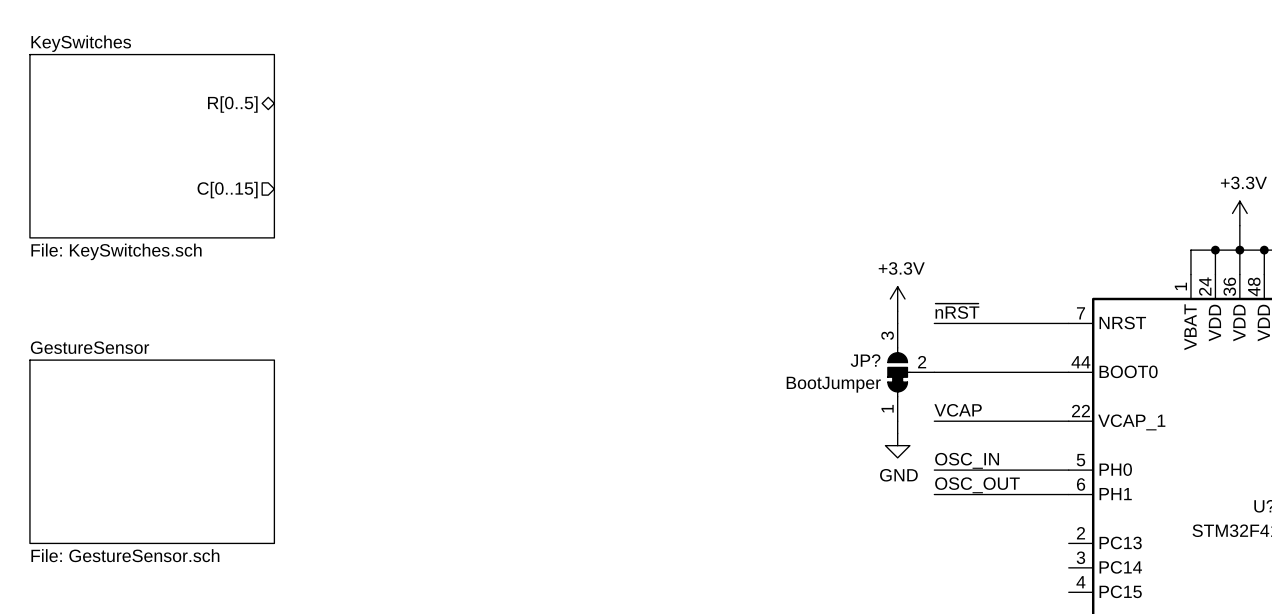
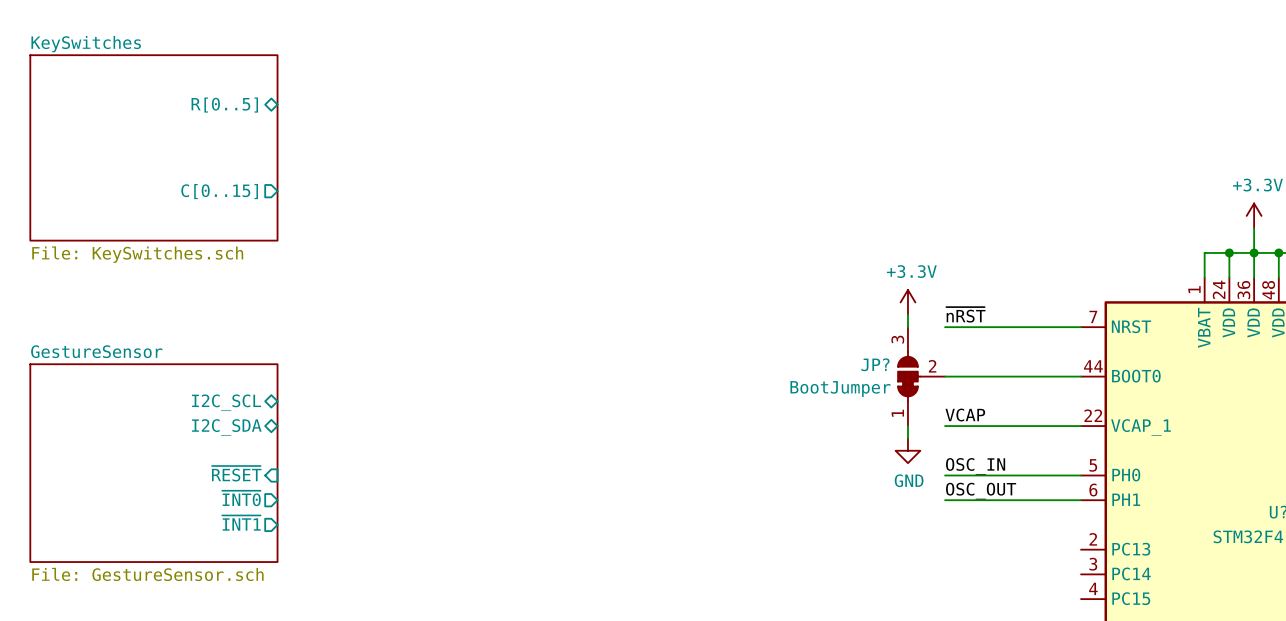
sheet GestureSensor shape: [29, 360, 275, 544] -> [30, 364, 278, 563]
sheet pin: none -> I2C_SCL (226, 402)
sheet pin: none -> I2C_SDA (226, 427)
sheet pin: none -> ~{RESET} (236, 473)
sheet pin: none -> ~{INT0} (241, 498)
sheet pin: none -> ~{INT1} (241, 523)

